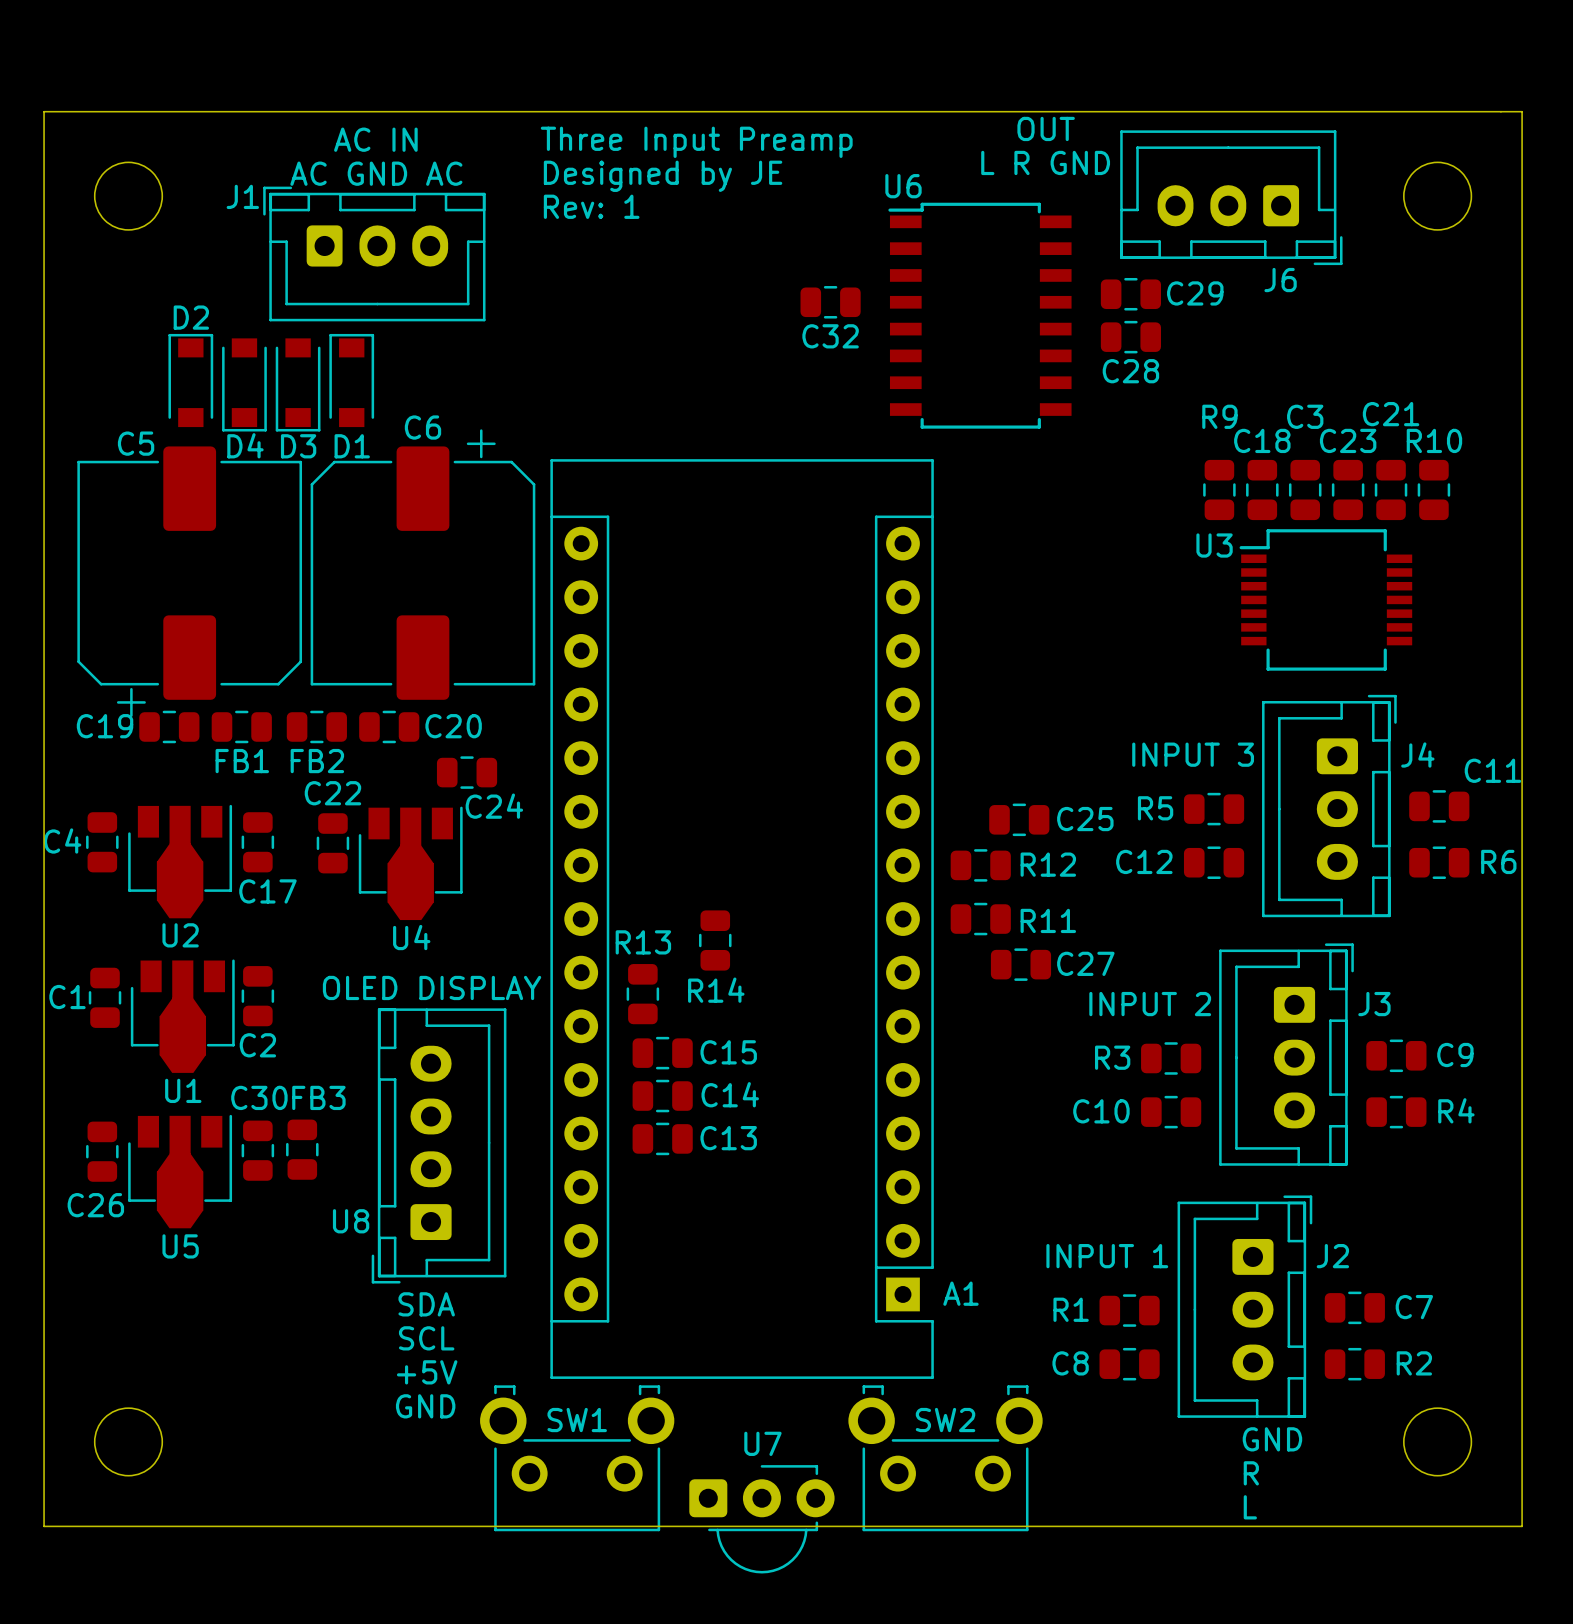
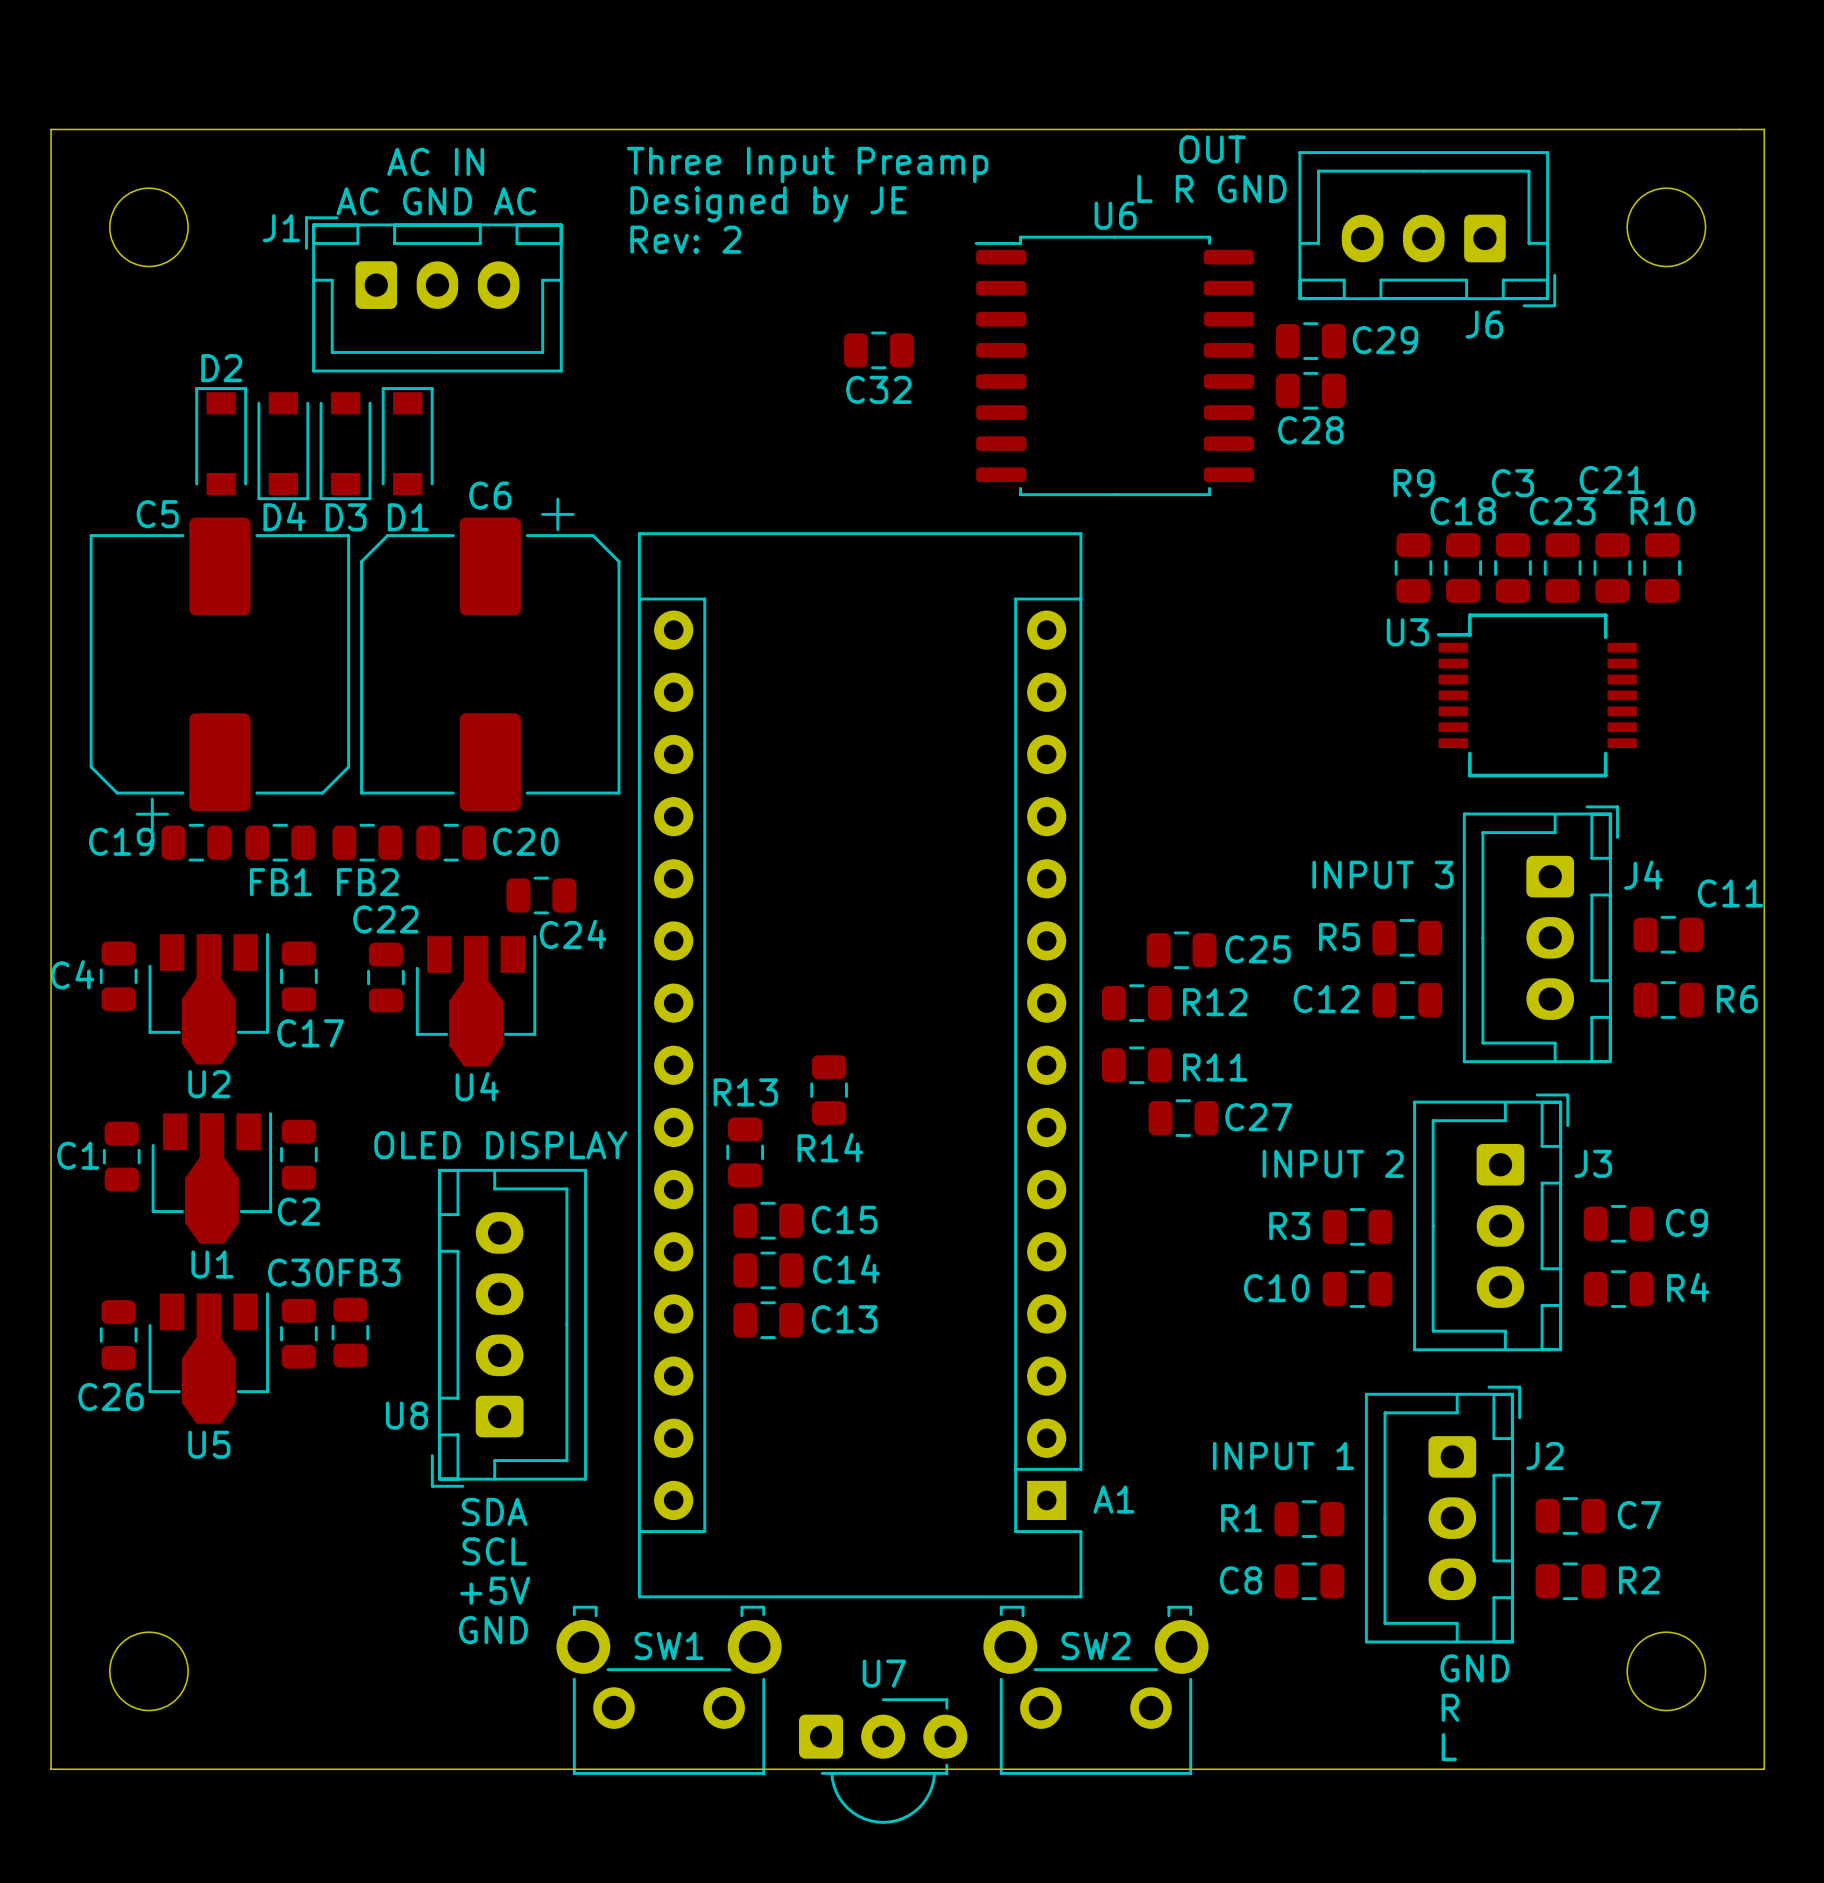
U6 name position: U6 (903, 186) -> U6 (1115, 215)
U6 footprint: [888, 202, 1072, 429] -> [974, 235, 1254, 497]
text: Rev: 1 (591, 206) -> Rev: 2 (685, 239)
C32 position: (830, 302) -> (878, 350)

